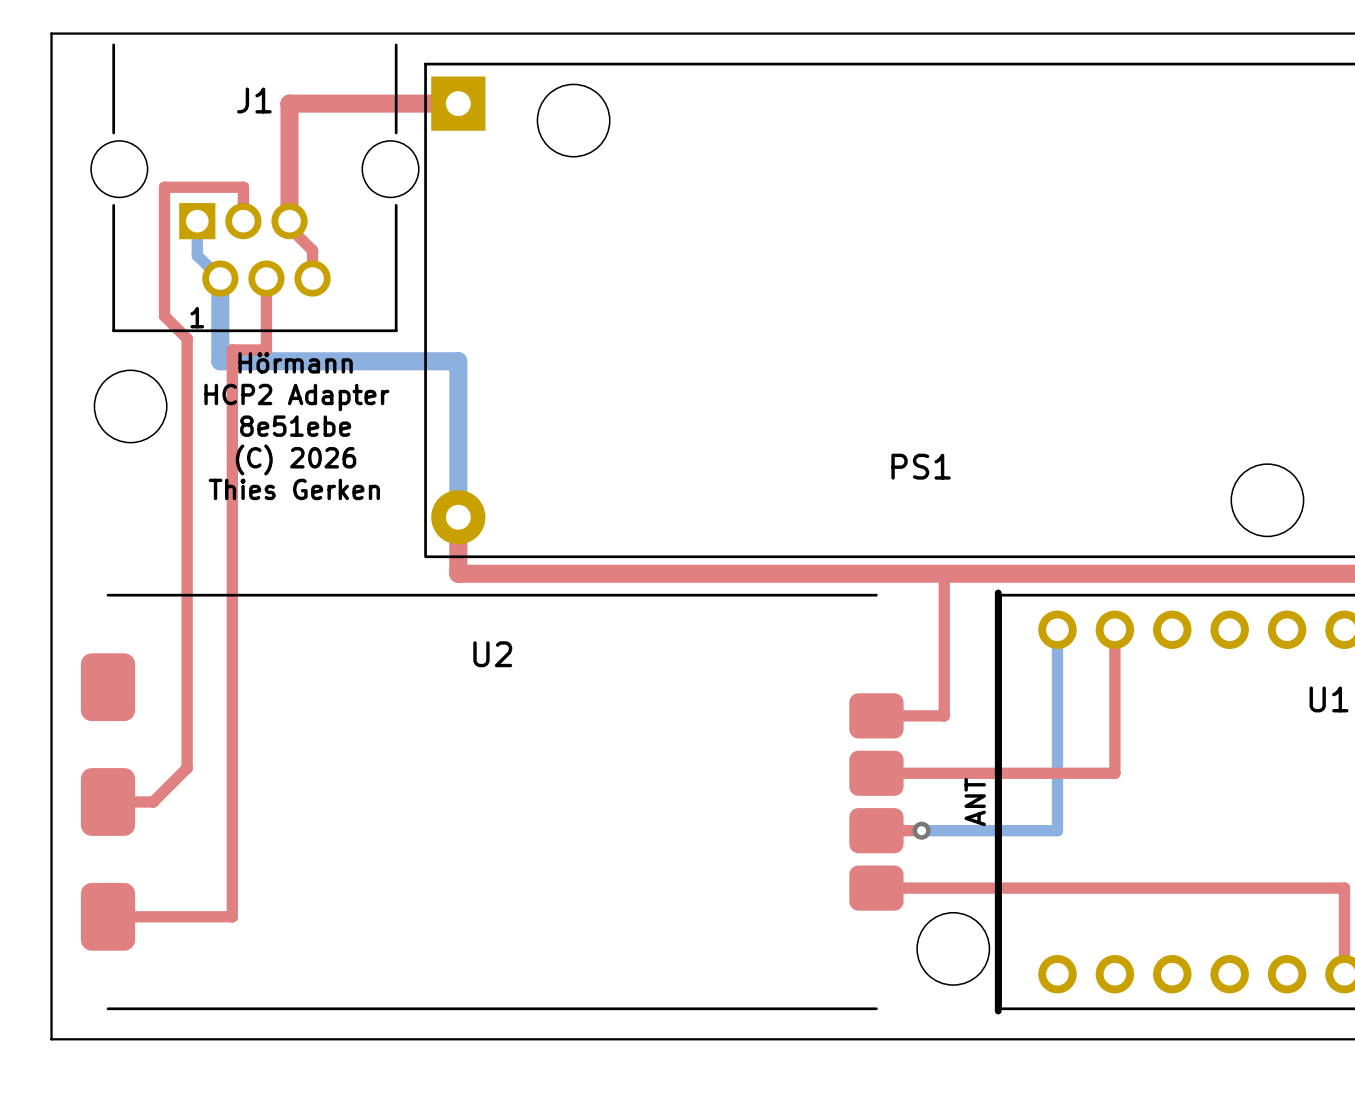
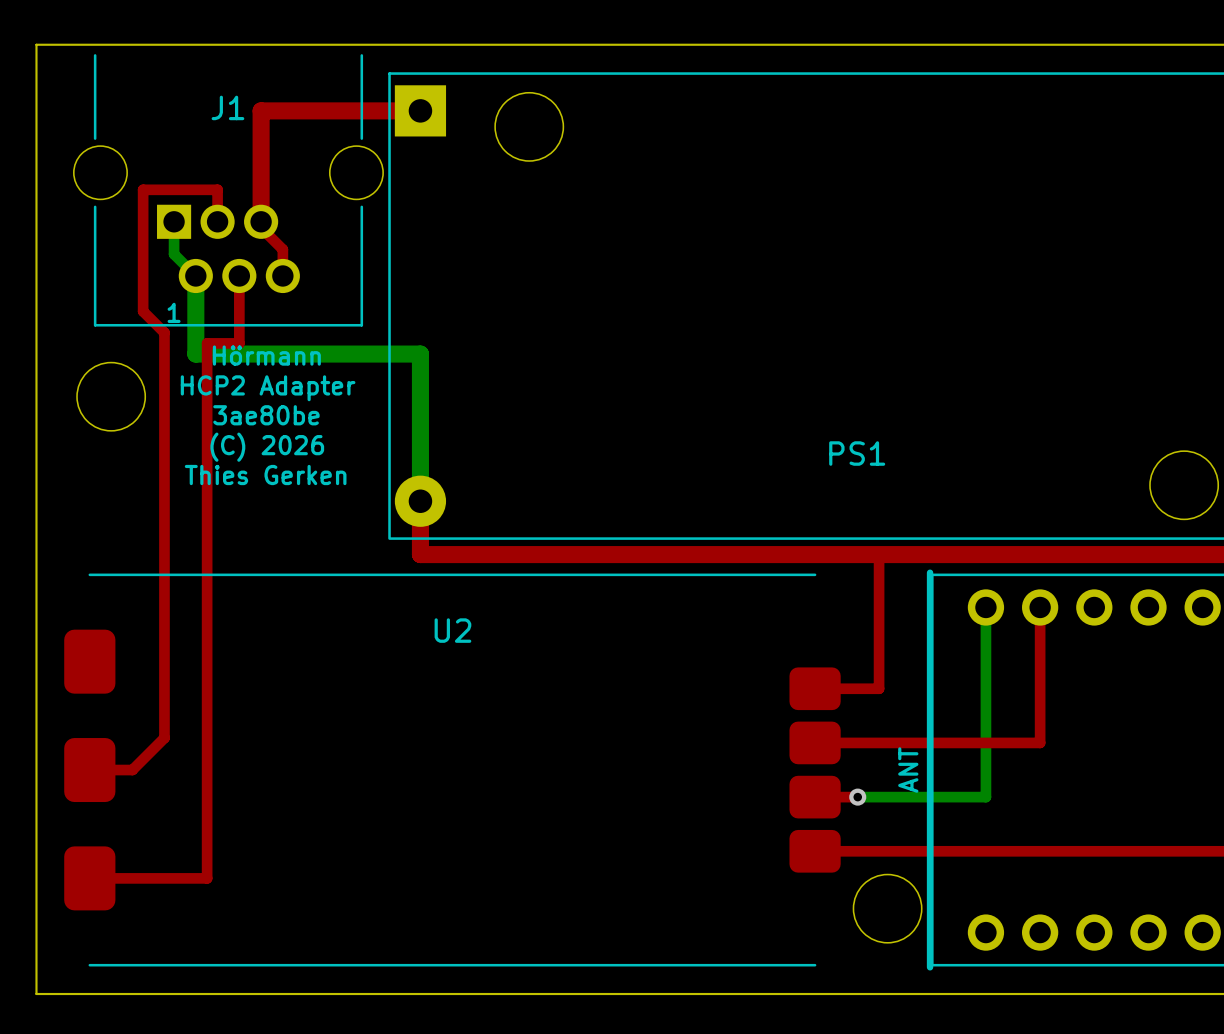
text: 8e51ebe (295, 426) -> 3ae80be (266, 415)

